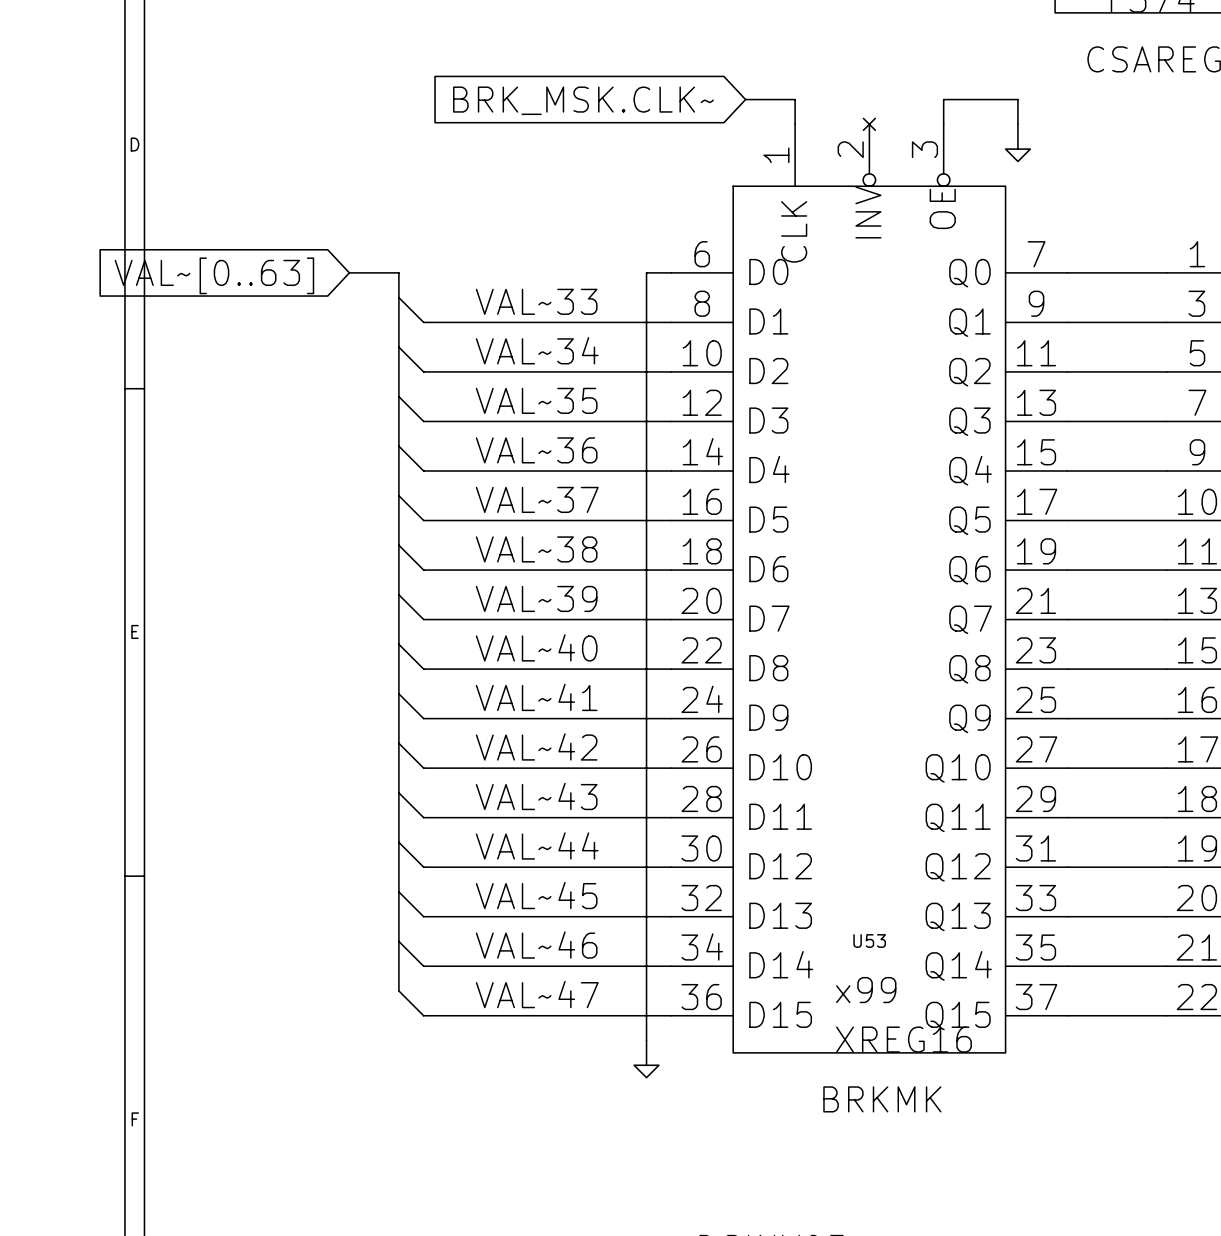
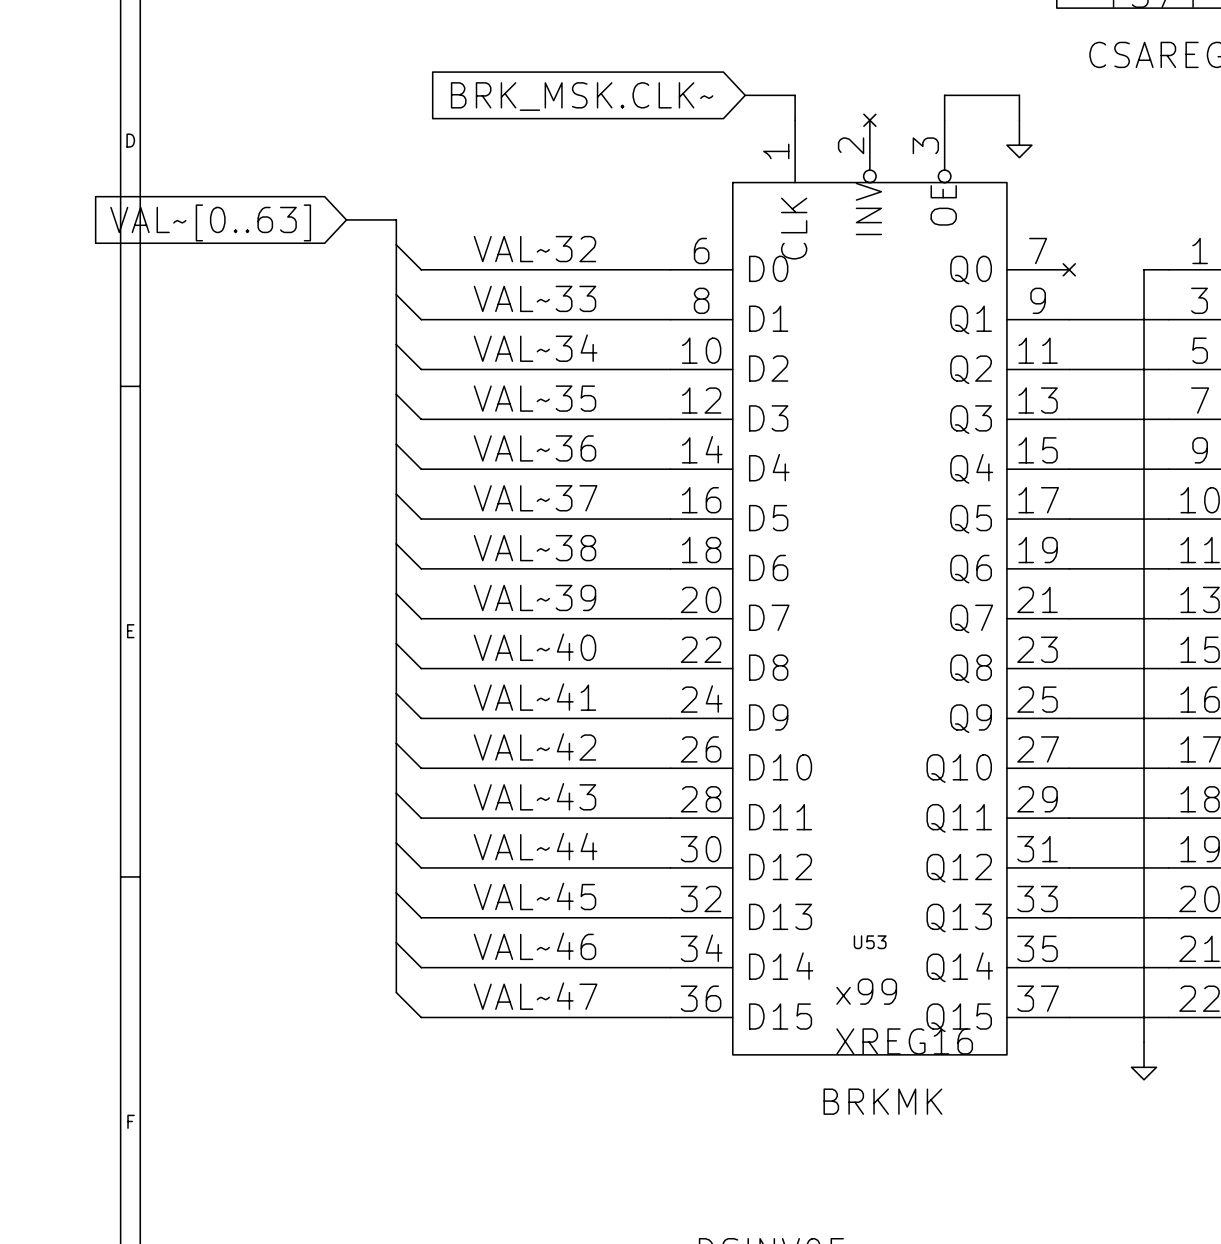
label: none -> VAL~32 (534, 249)
bus: (349, 272) (398, 272) -> (346, 219) (396, 219) (396, 269)
wire: (646, 272) (646, 1040) -> (645, 269) (421, 269) (396, 244)
wire: (1067, 272) (1141, 272) -> (1144, 1042) (1144, 269)
no-connect mark: none -> (1069, 269)
global label position: VAL~[0..63] (214, 275) -> VAL~[0..63] (210, 222)
power symbol: (646, 1059) -> none
power symbol: none -> (1144, 1061)

